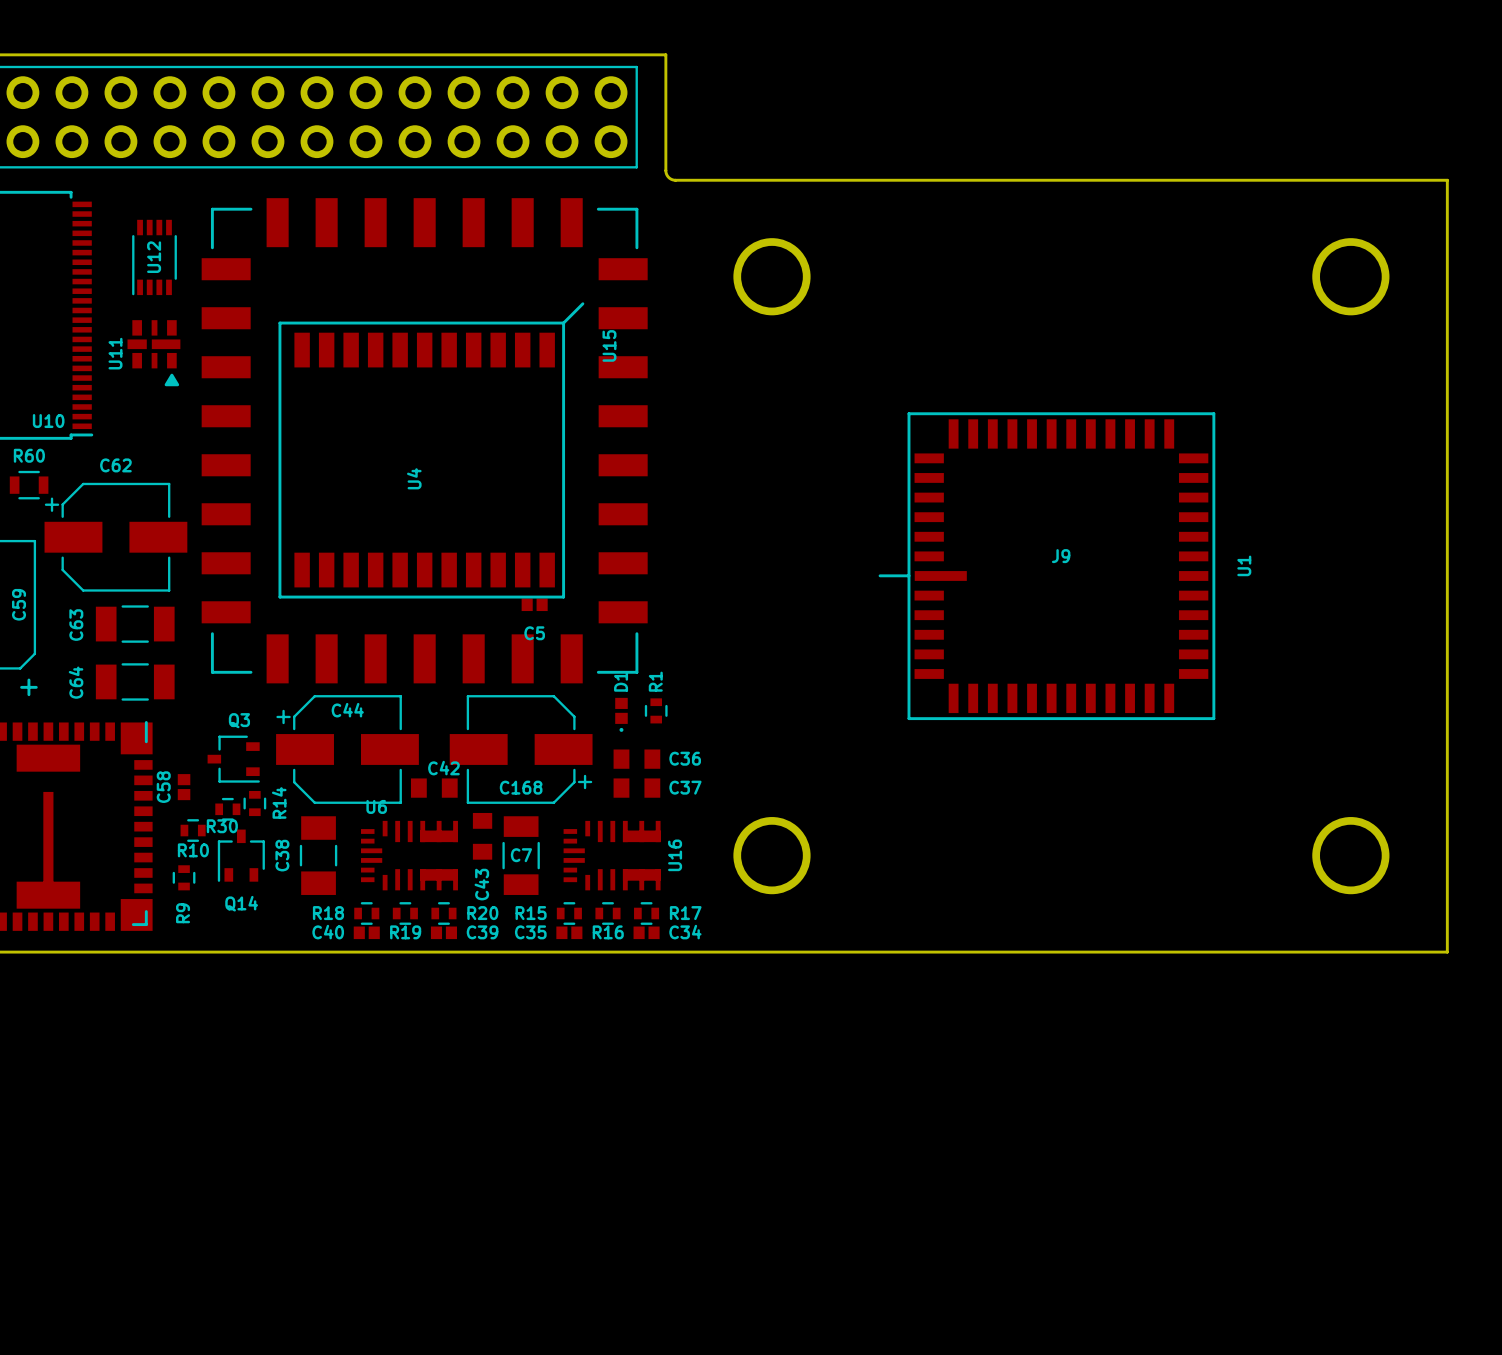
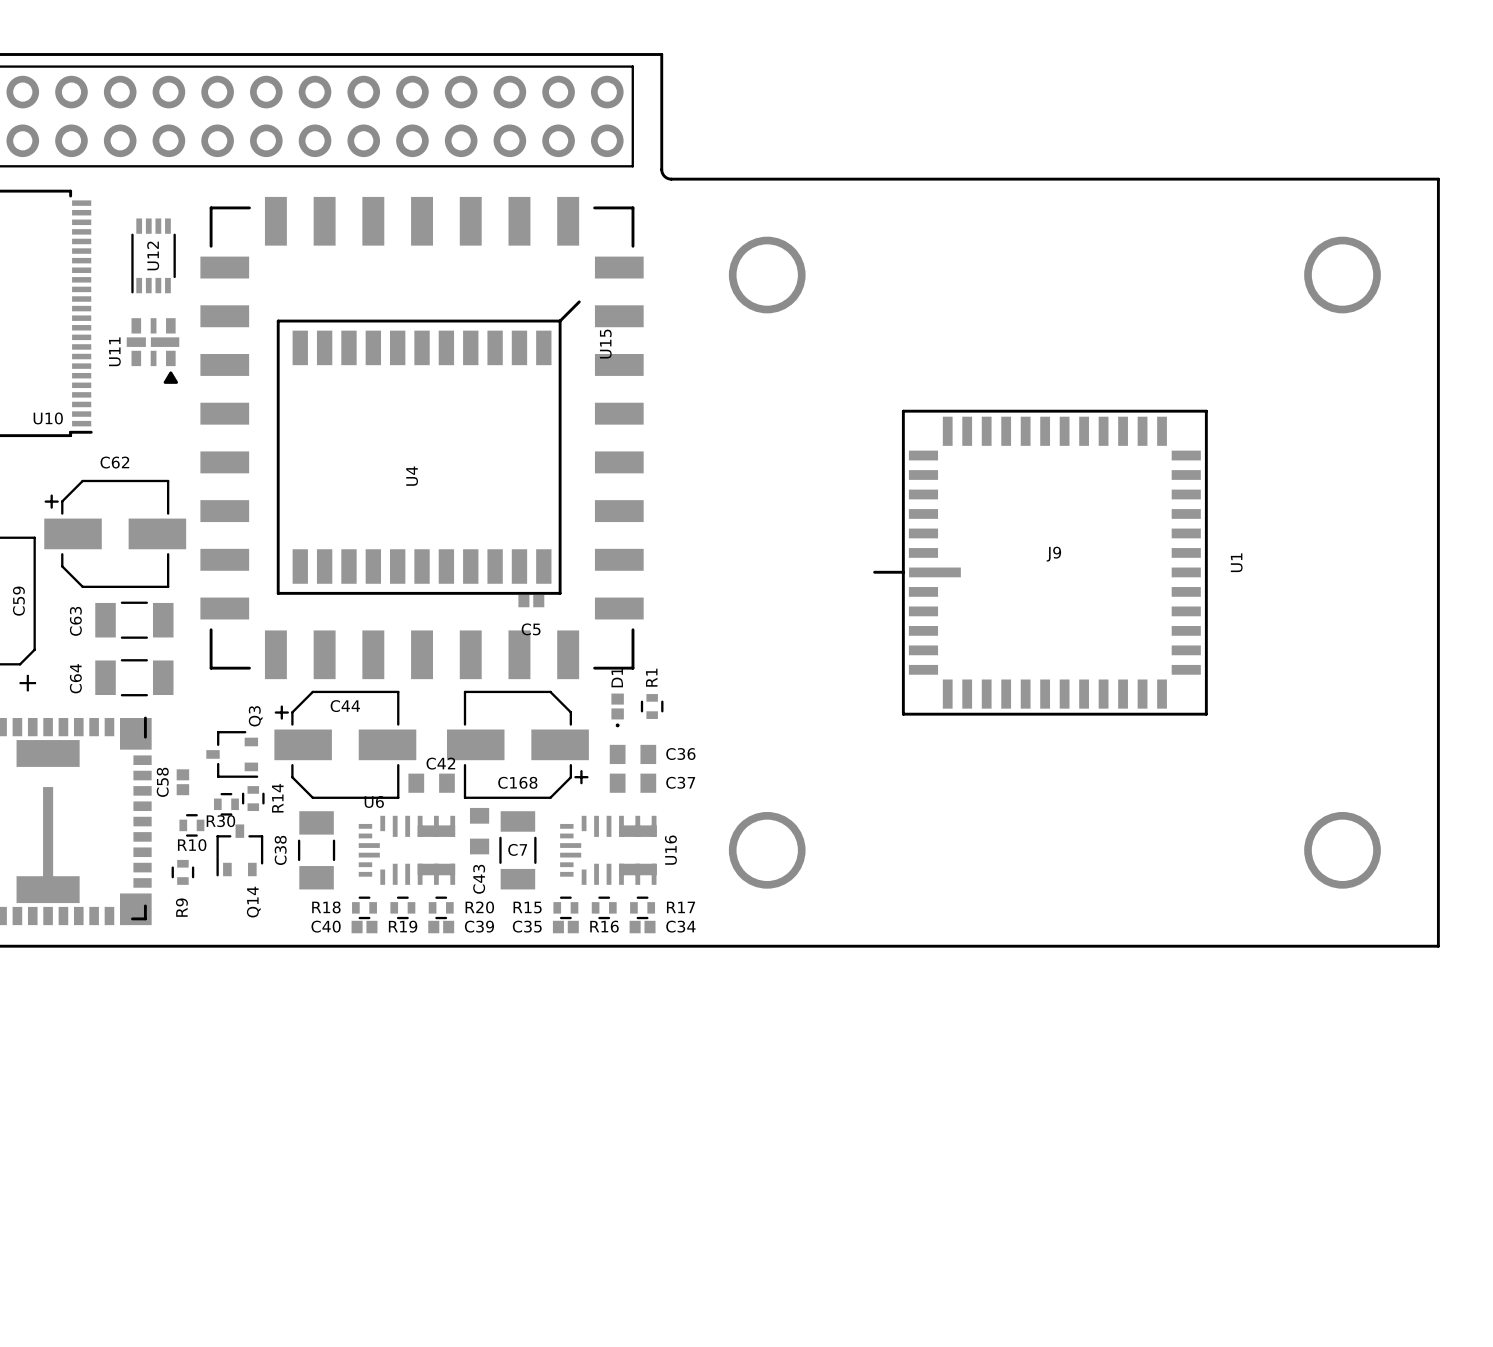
R60: (29, 485) -> none
Q3 name rotation: 0° (239, 720) -> 90° counterclockwise (255, 716)
Q14 name rotation: 0° (241, 903) -> 90° counterclockwise (253, 902)

